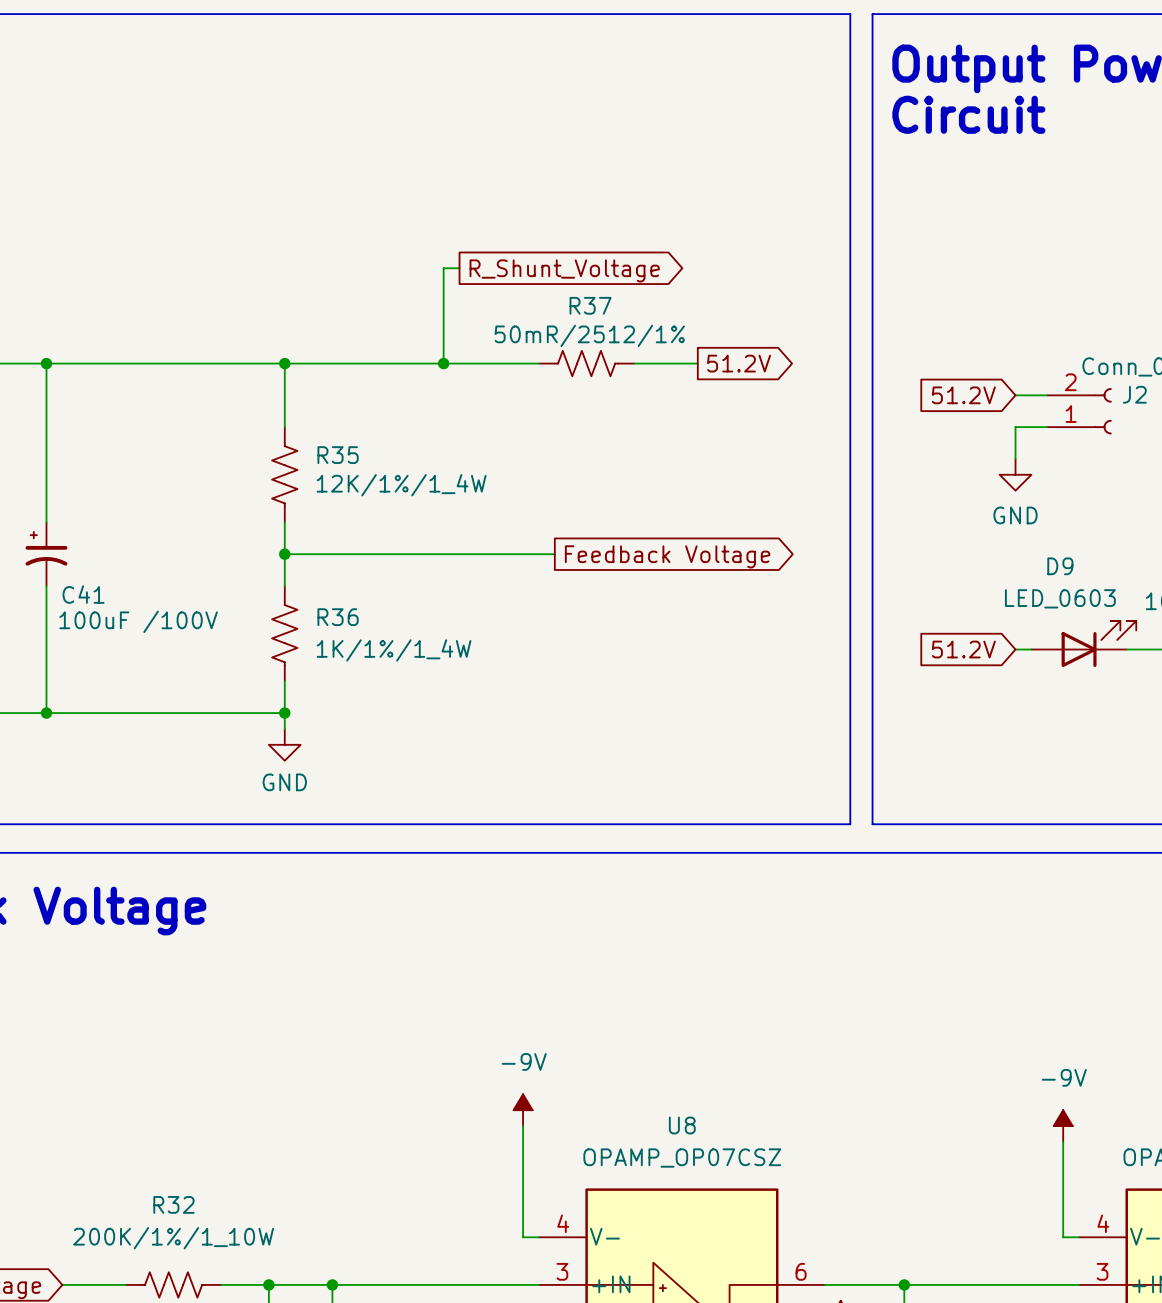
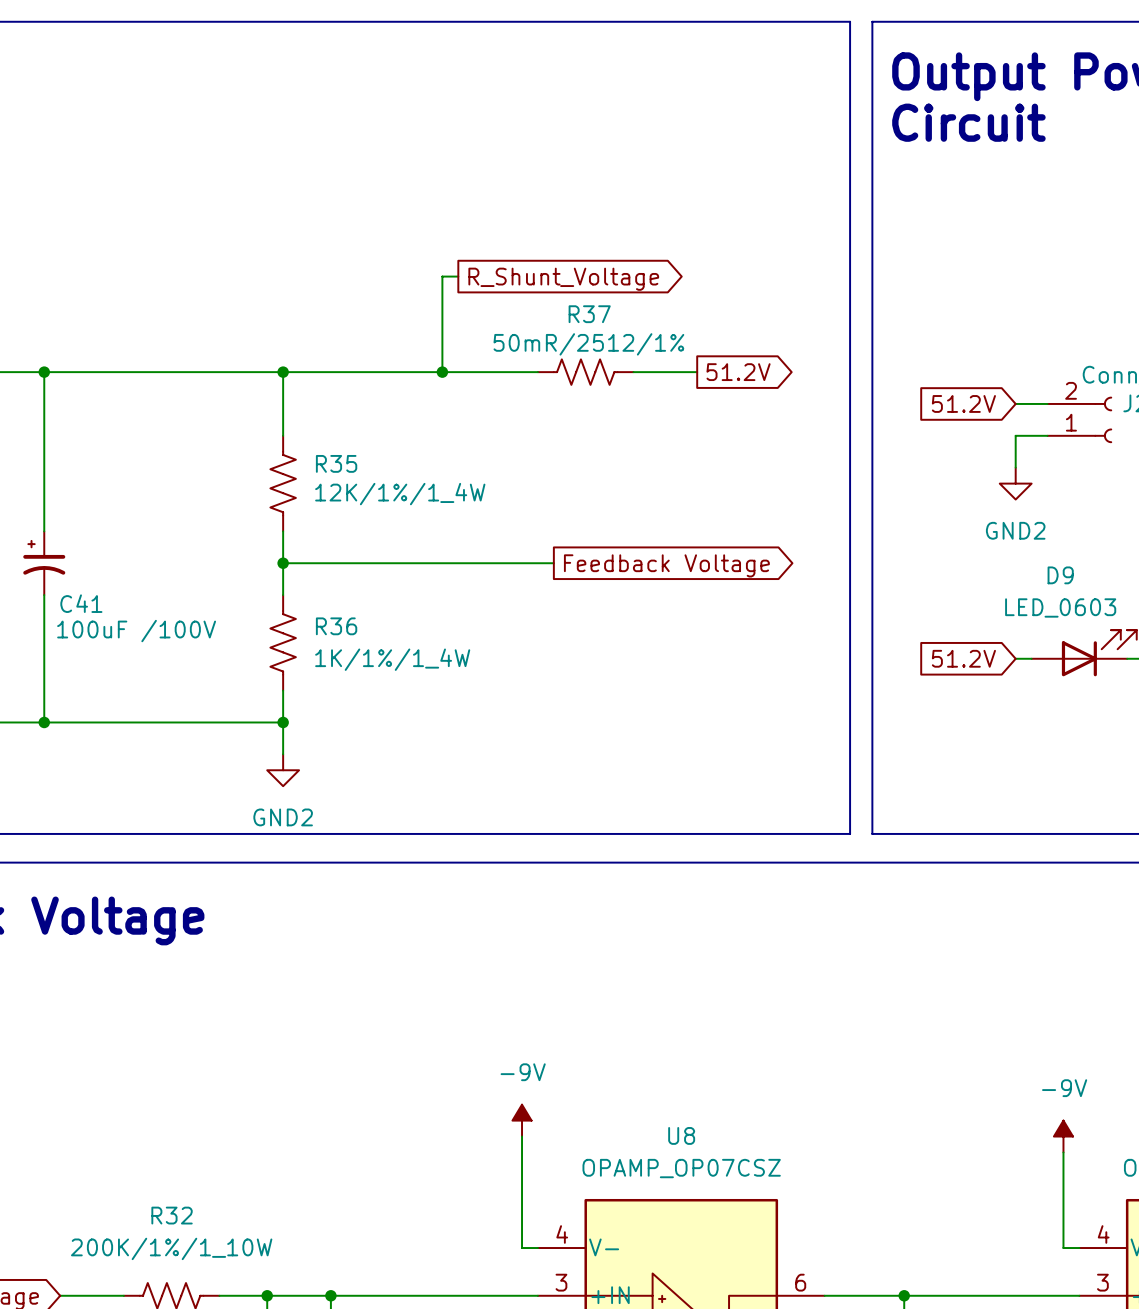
power symbol: GND (1015, 474) -> GND2 (1015, 483)
power symbol: GND (284, 744) -> none
power symbol: none -> GND2 (283, 770)

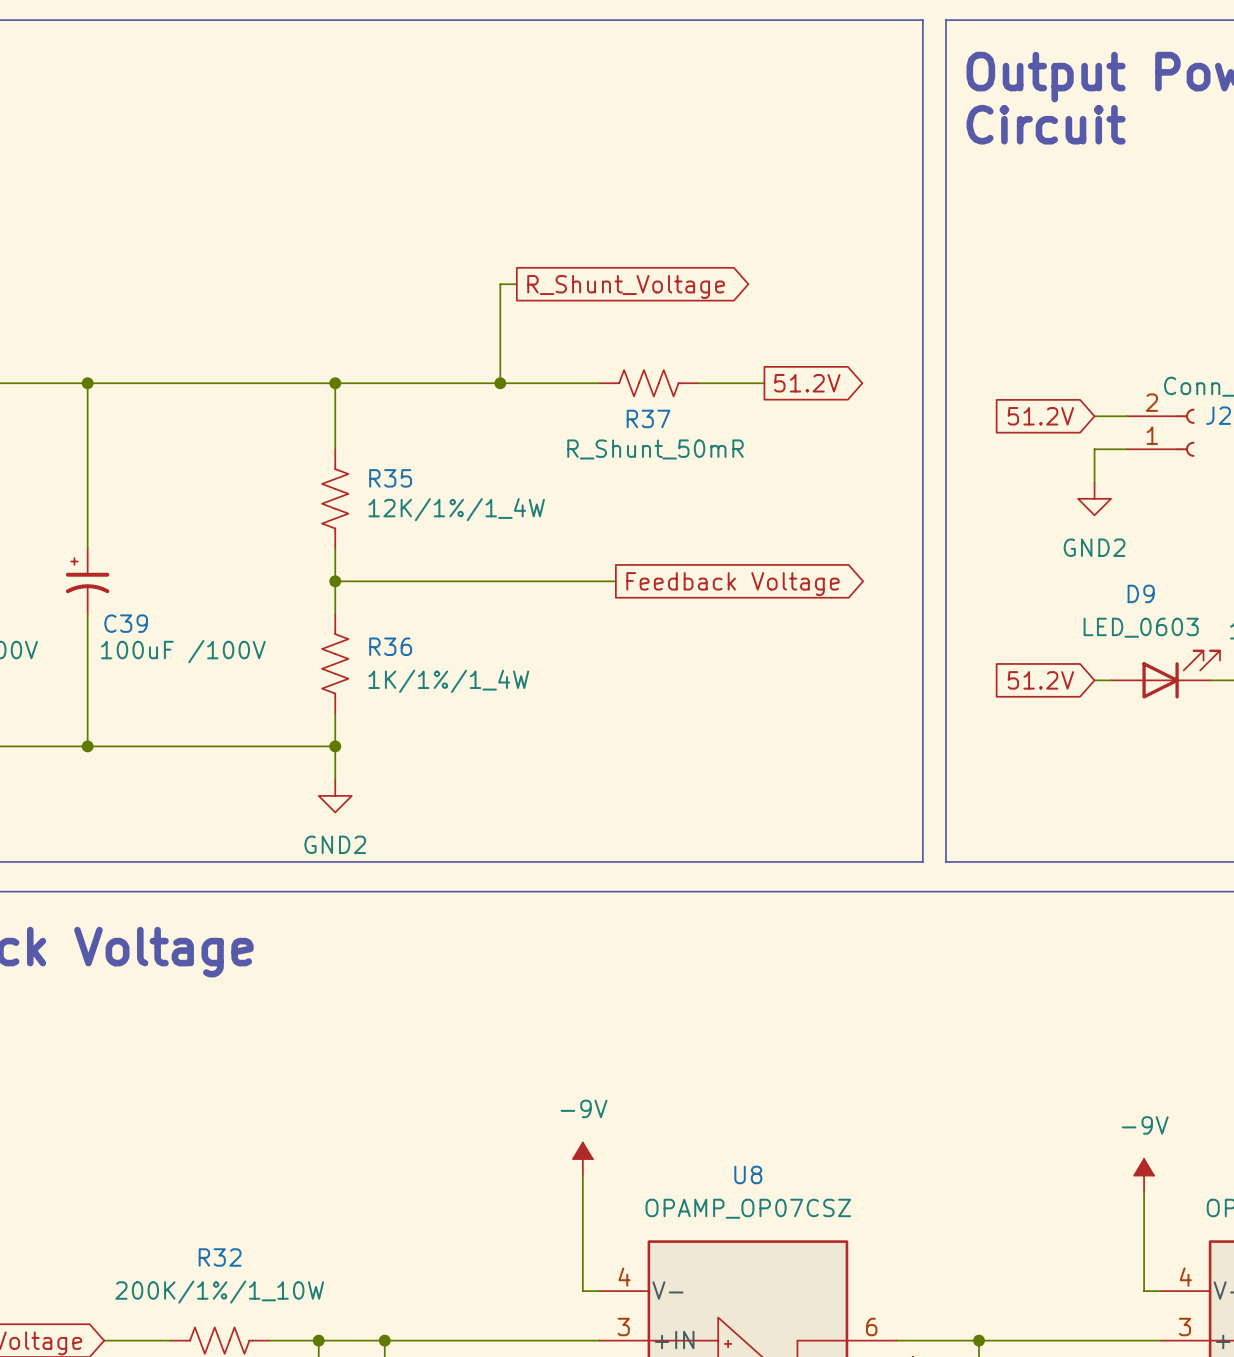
R37 name position: R37 (589, 314) -> R37 (648, 418)
R37 value: 50mR/2512/1% (588, 344) -> R_Shunt_50mR (655, 449)
C41 name: C41 (81, 603) -> C39 (126, 623)

